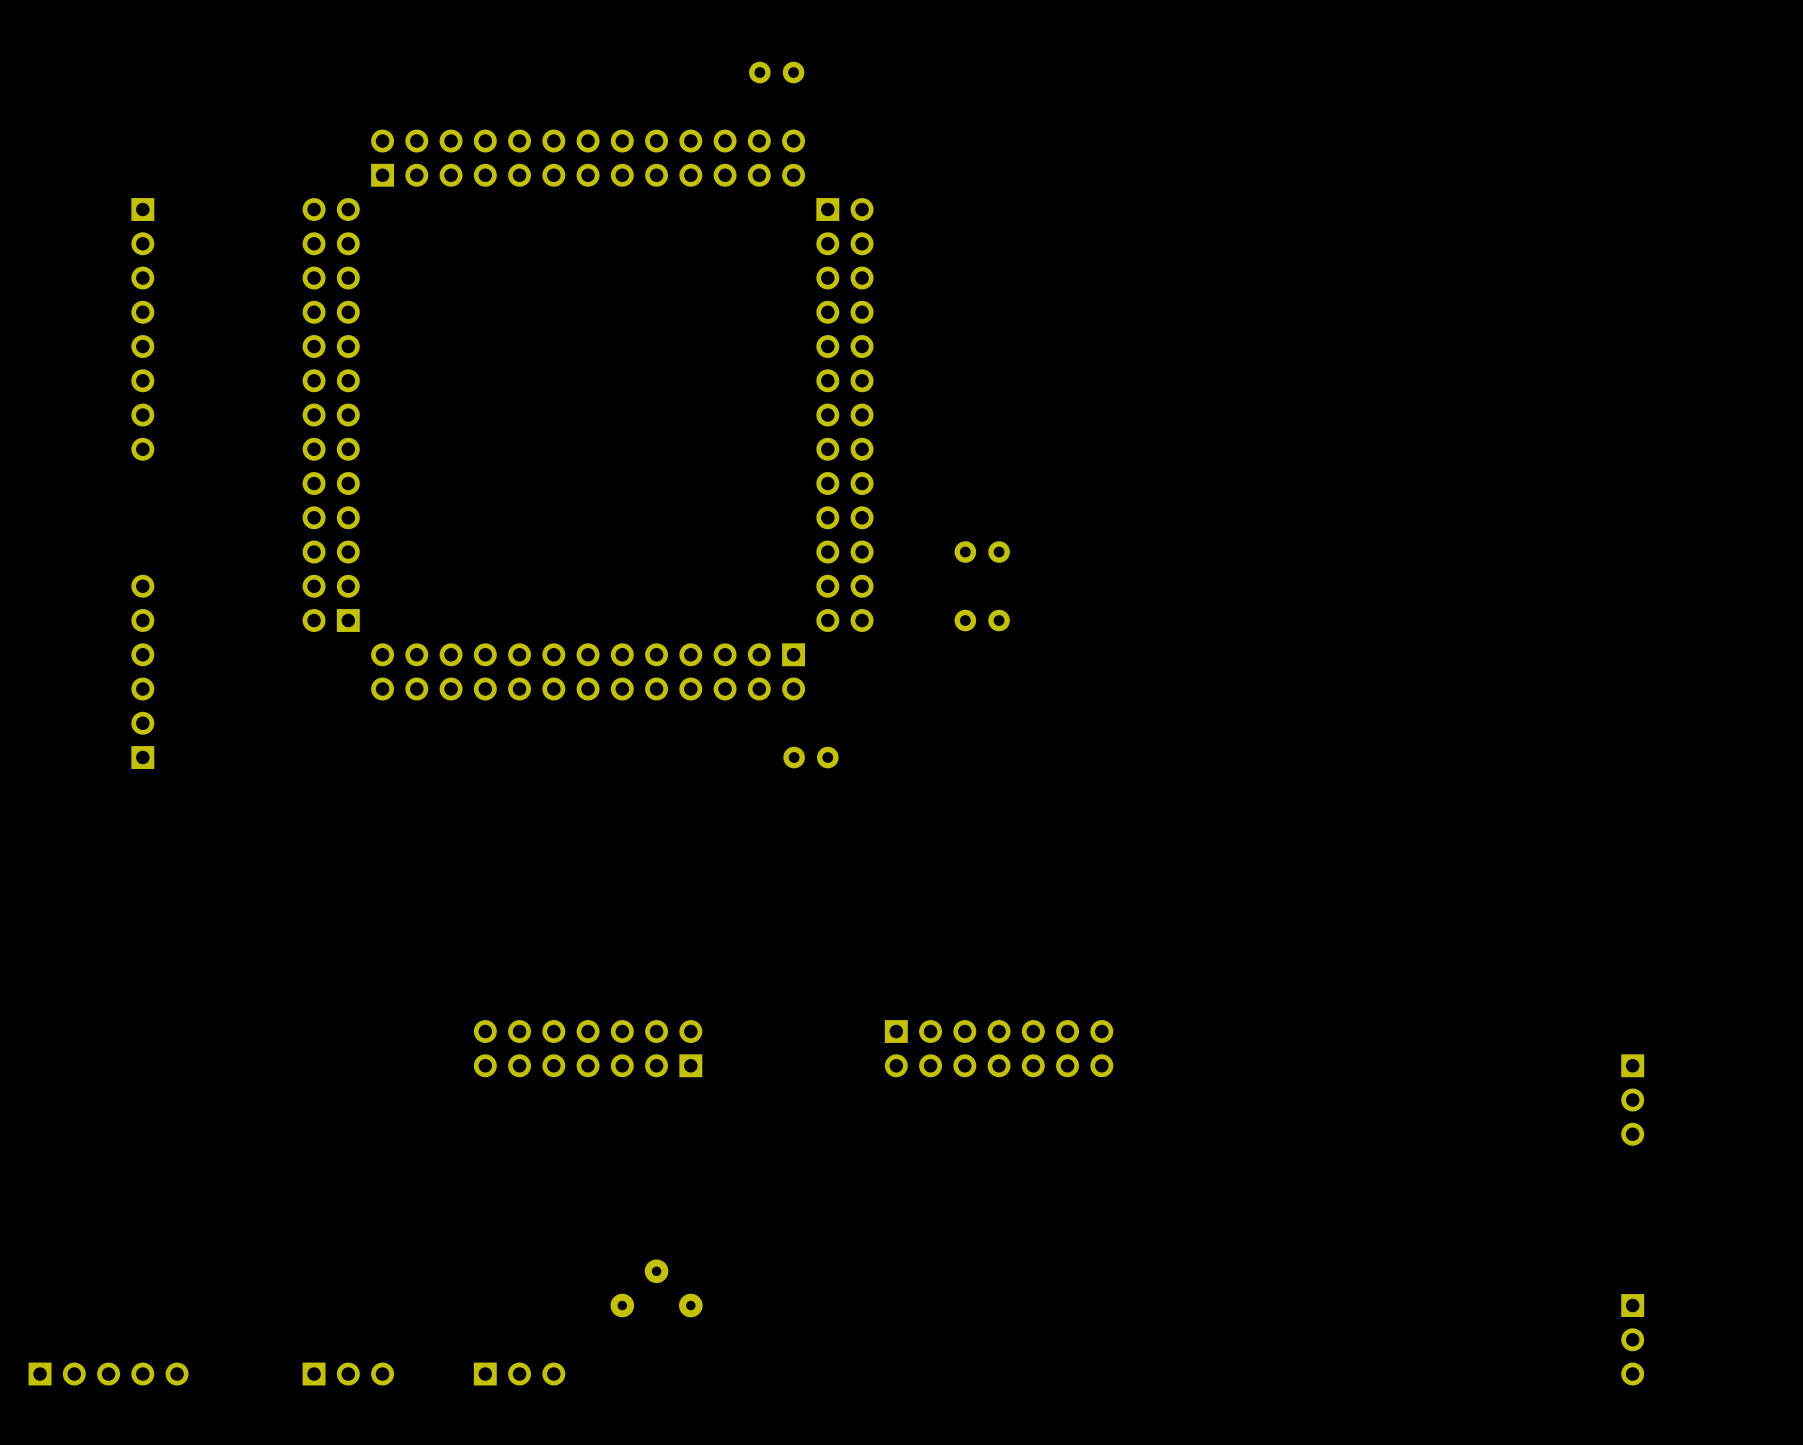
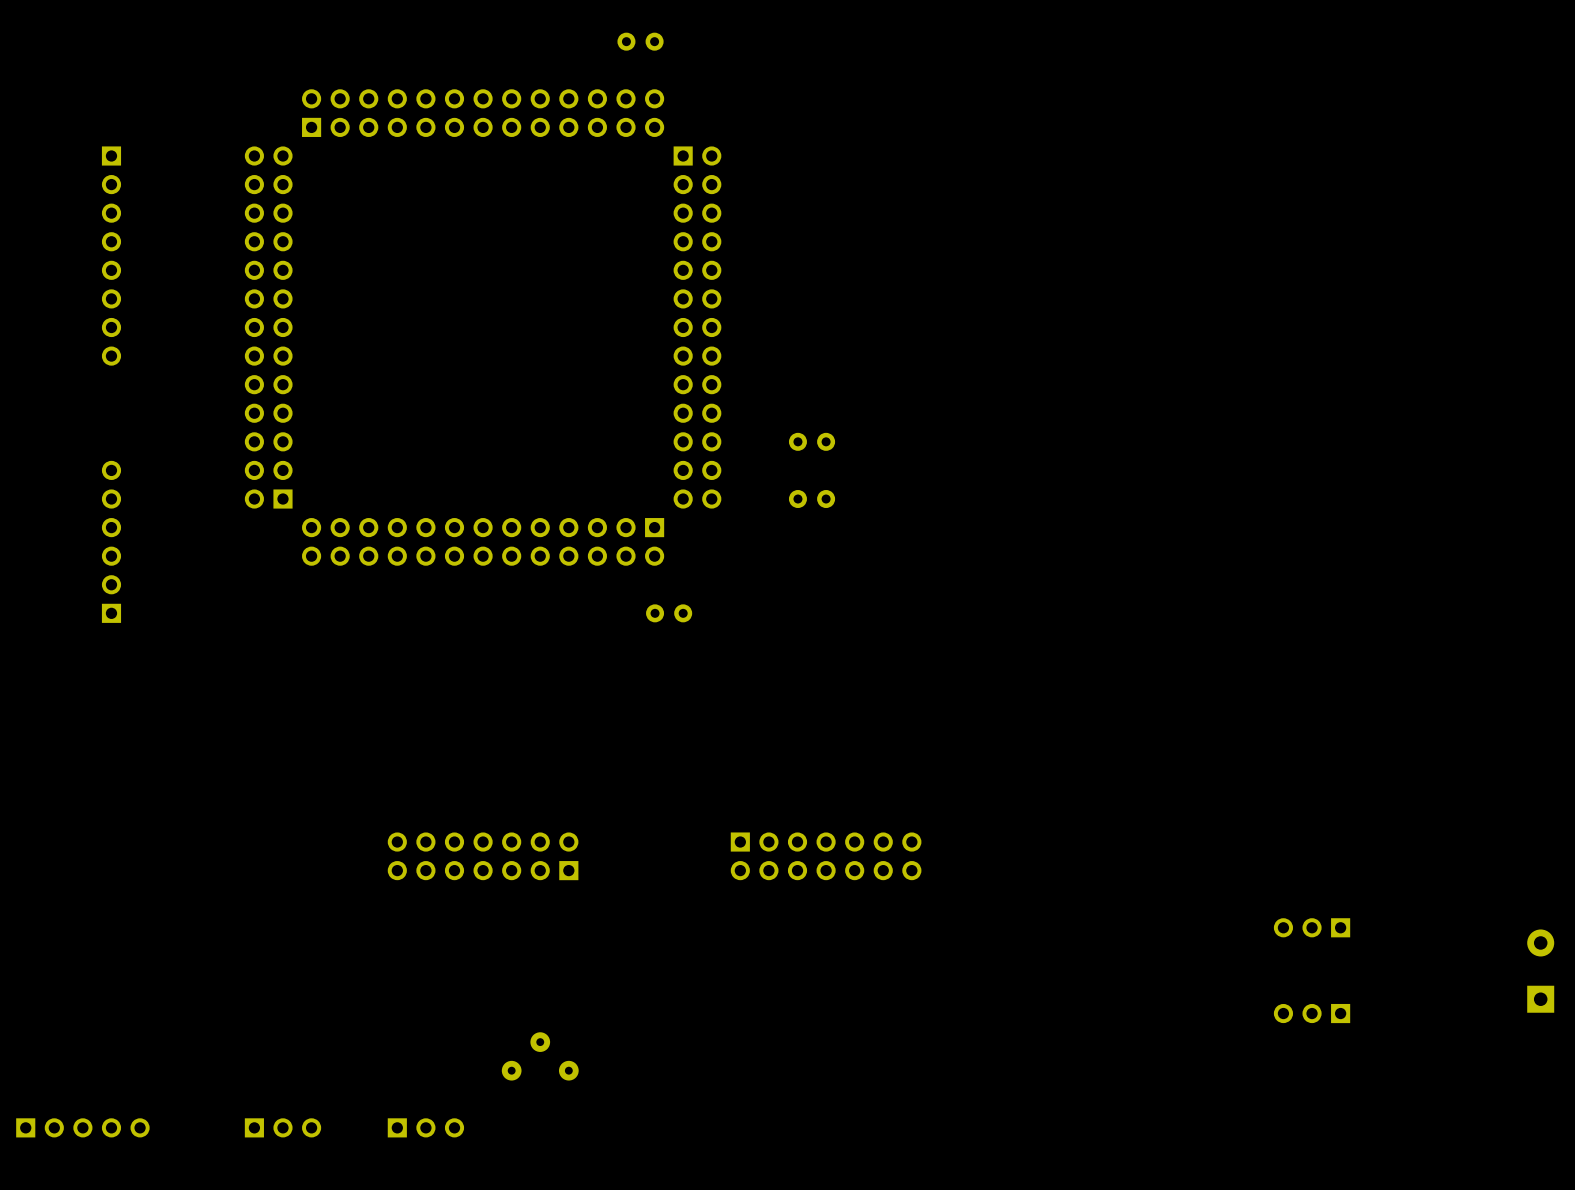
part rotation: 0° (1632, 1100) -> 90° clockwise (1312, 927)
part position: (1632, 1100) -> (1312, 927)
part: none -> (1312, 1013)
part: (1632, 1339) -> none

